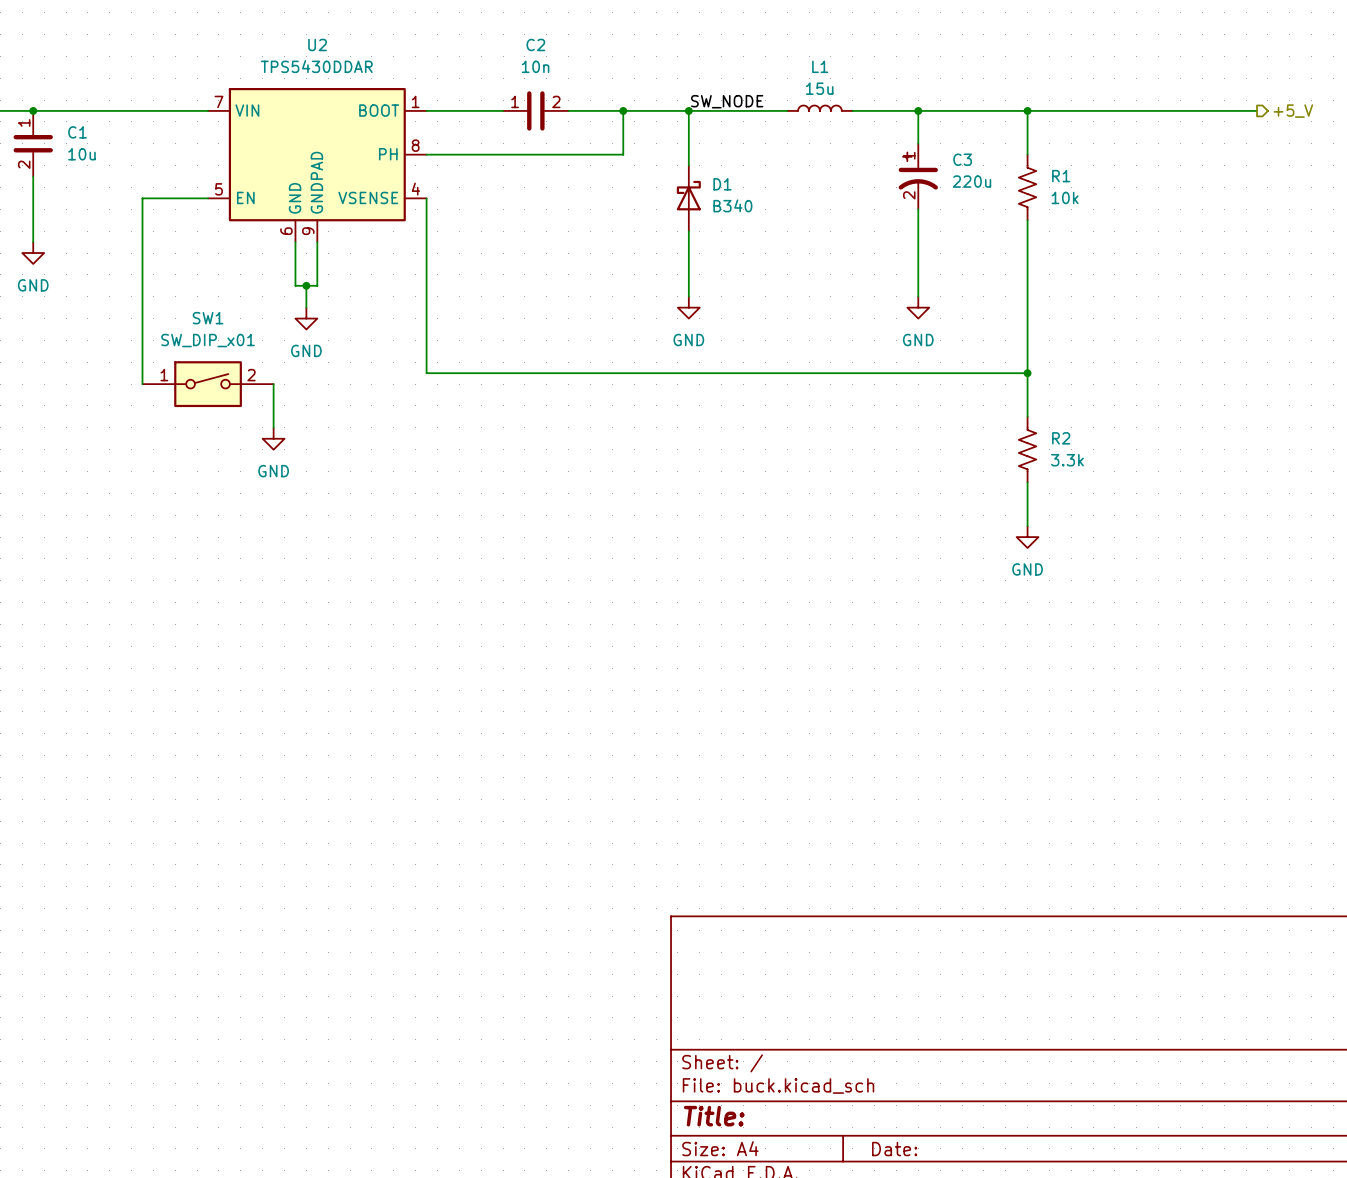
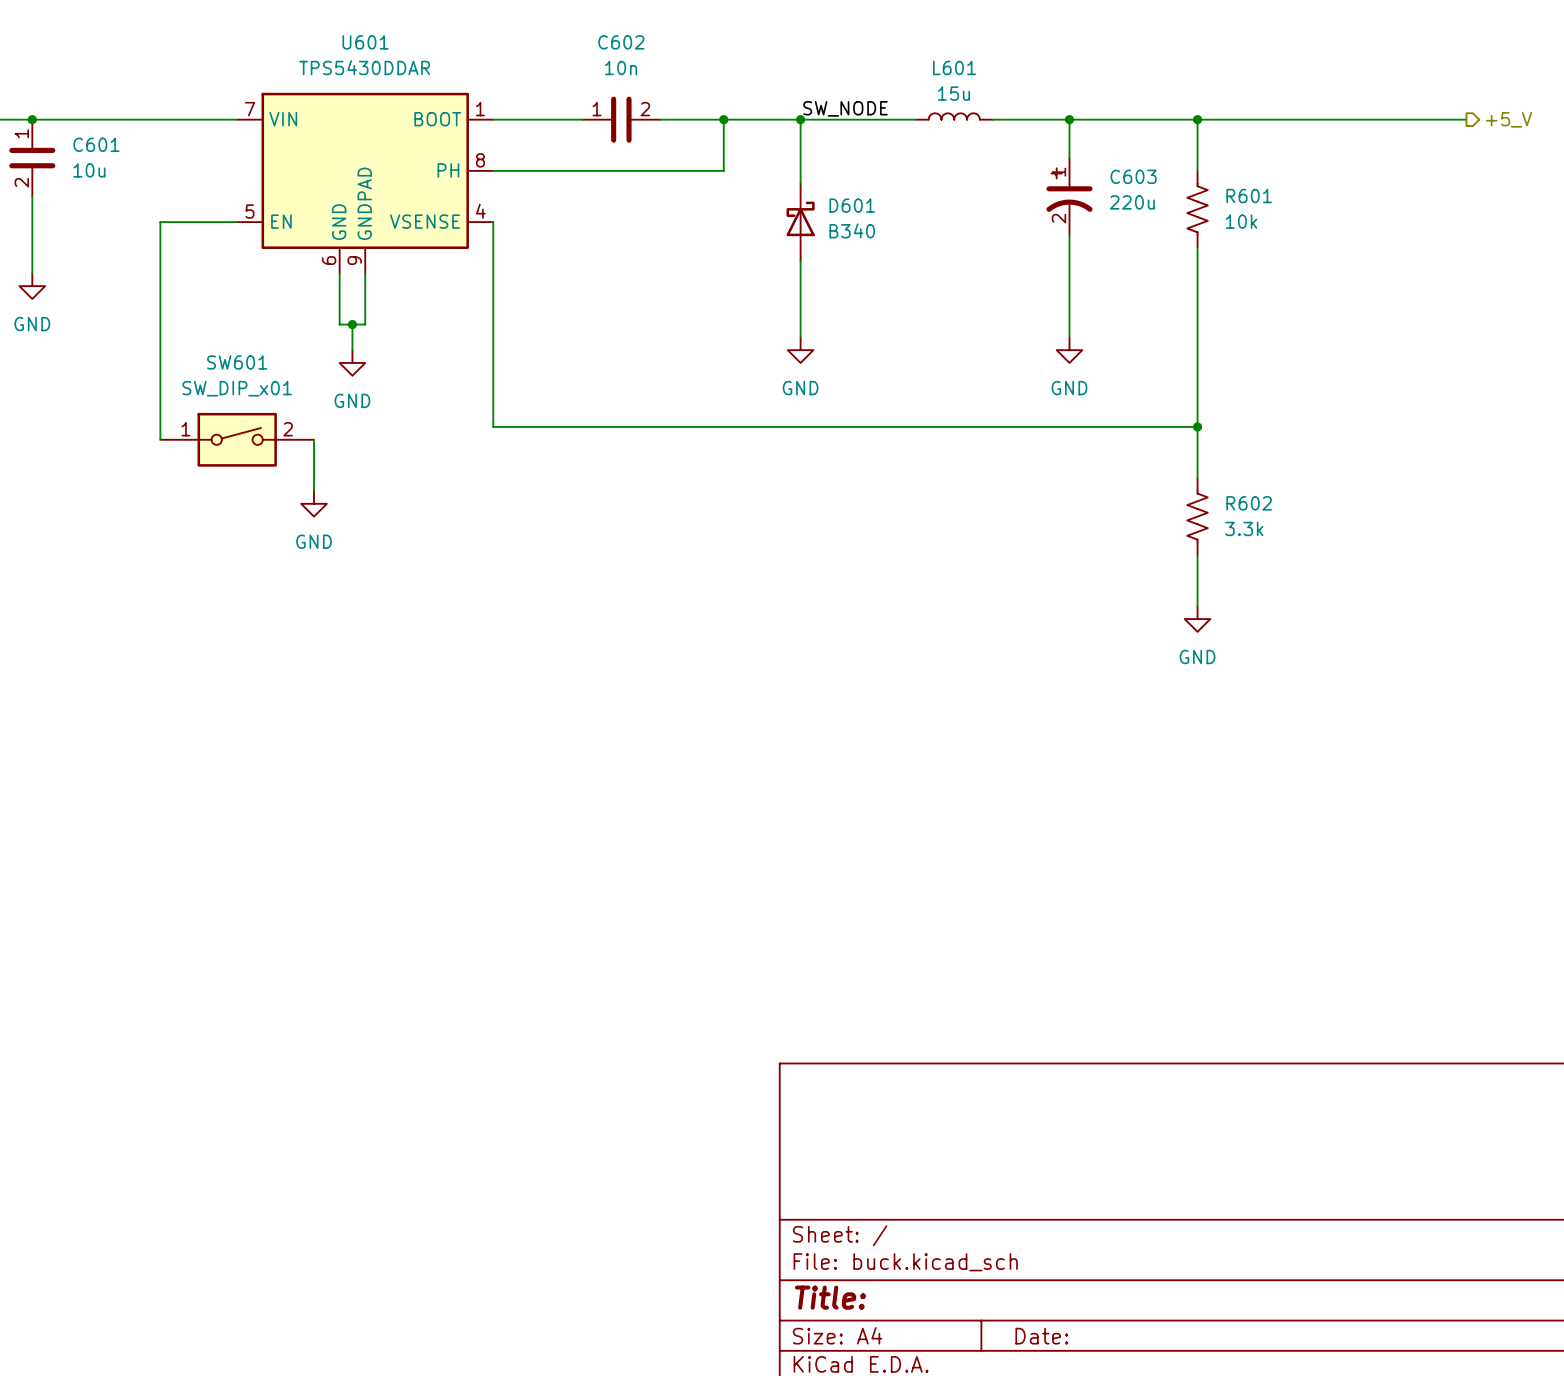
U2 name: U2 (317, 44) -> U601 (365, 42)
C2 name: C2 (535, 44) -> C602 (621, 42)
L1 name: L1 (820, 66) -> L601 (954, 67)
C1 name: C1 (77, 132) -> C601 (96, 144)
C3 name: C3 (962, 159) -> C603 (1133, 176)
R1 name: R1 (1061, 176) -> R601 (1249, 196)
D1 name: D1 (722, 184) -> D601 (852, 205)
SW1 name: SW1 (208, 318) -> SW601 (237, 362)
R2 name: R2 (1061, 438) -> R602 (1249, 503)

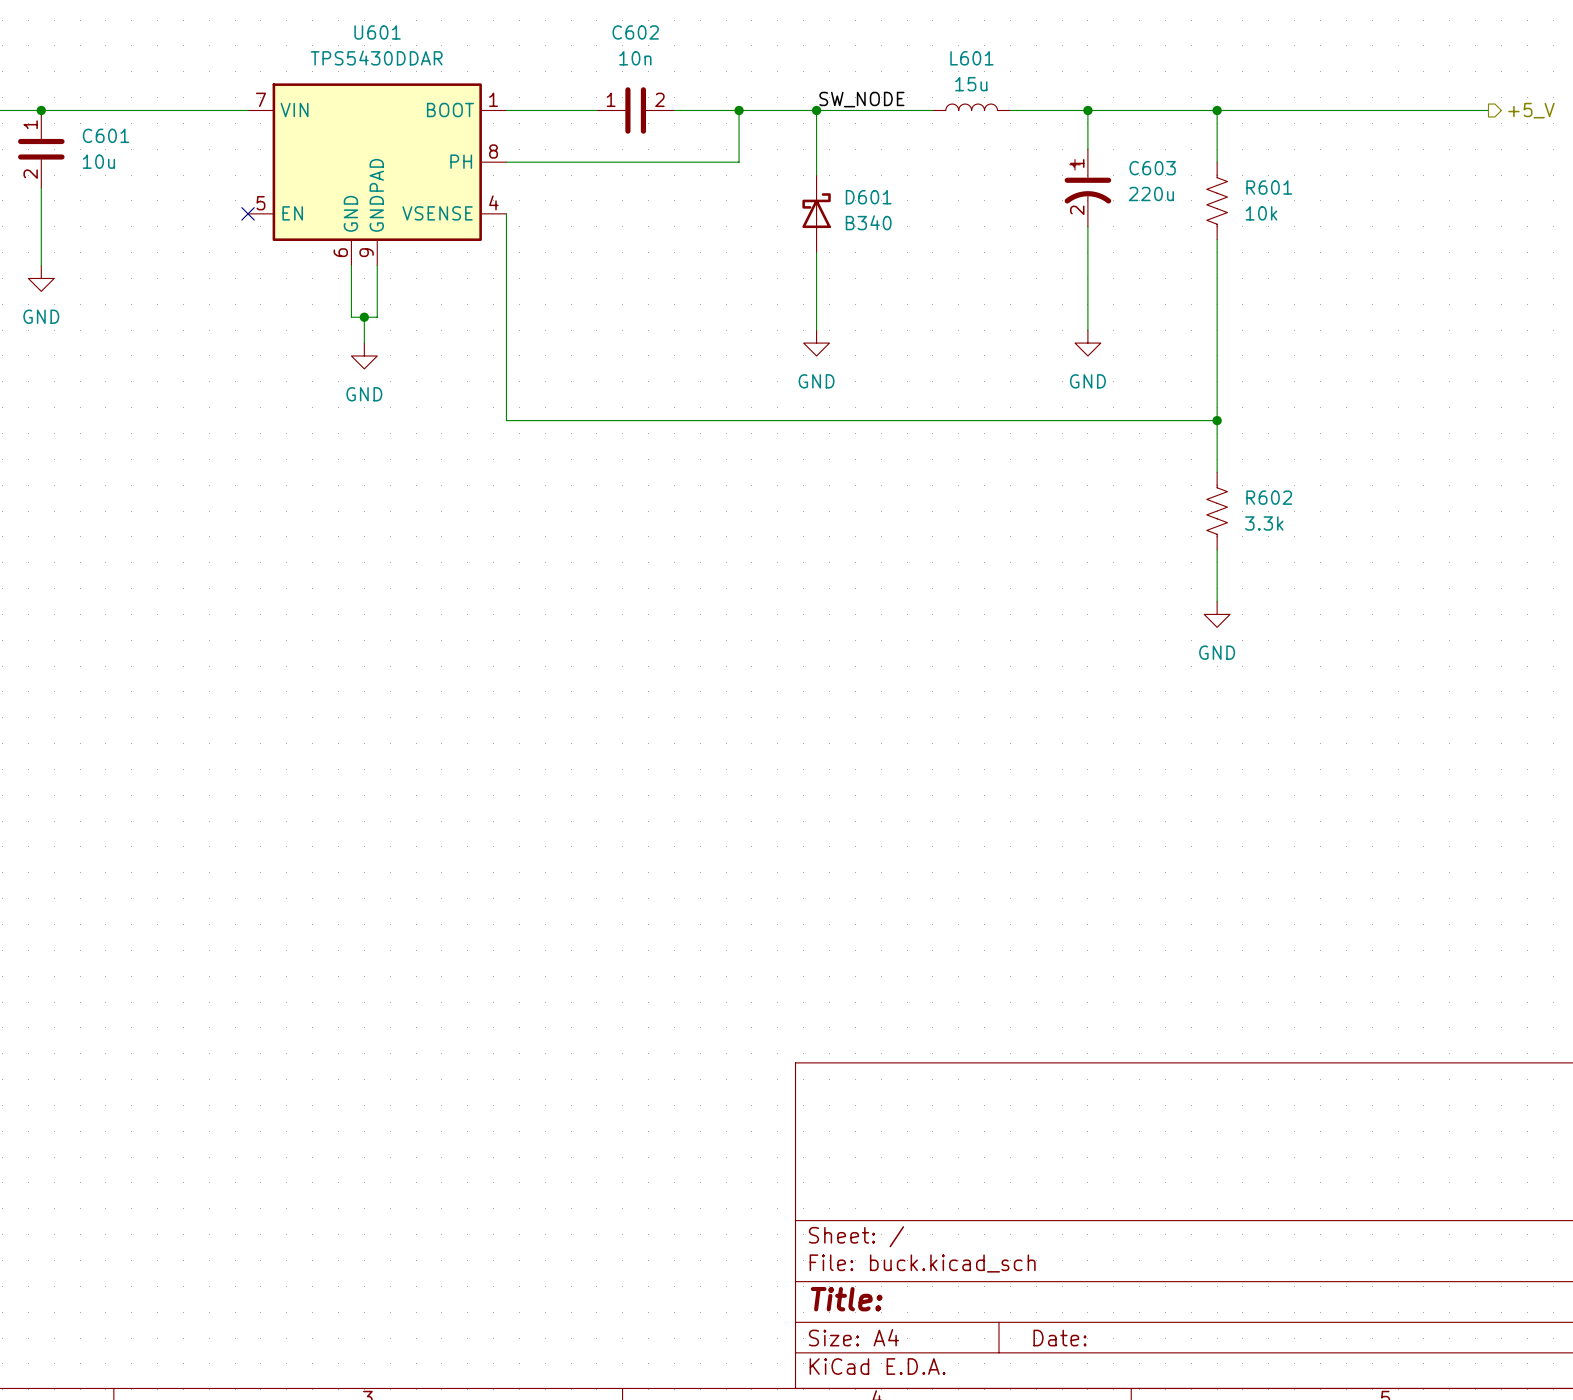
wire: (237, 222) (160, 222) (160, 439) -> none
no-connect mark: none -> (248, 213)
SW601: SW_DIP_x01 (237, 439) -> none
wire: (314, 439) (314, 491) -> none
power symbol: GND (314, 503) -> none

